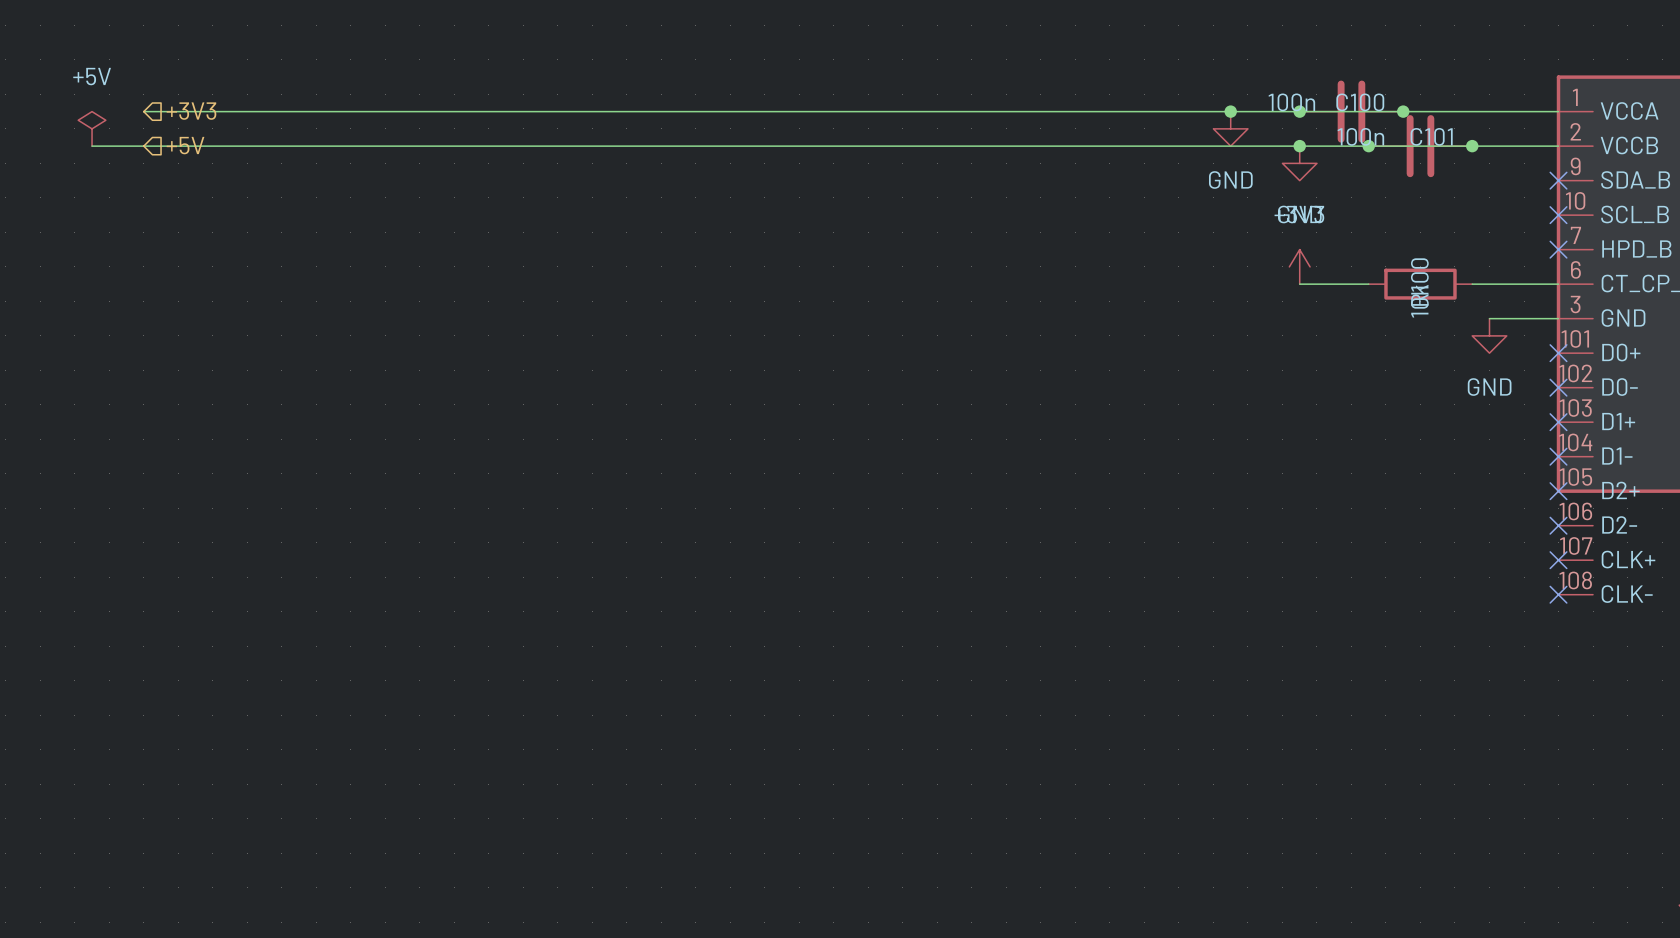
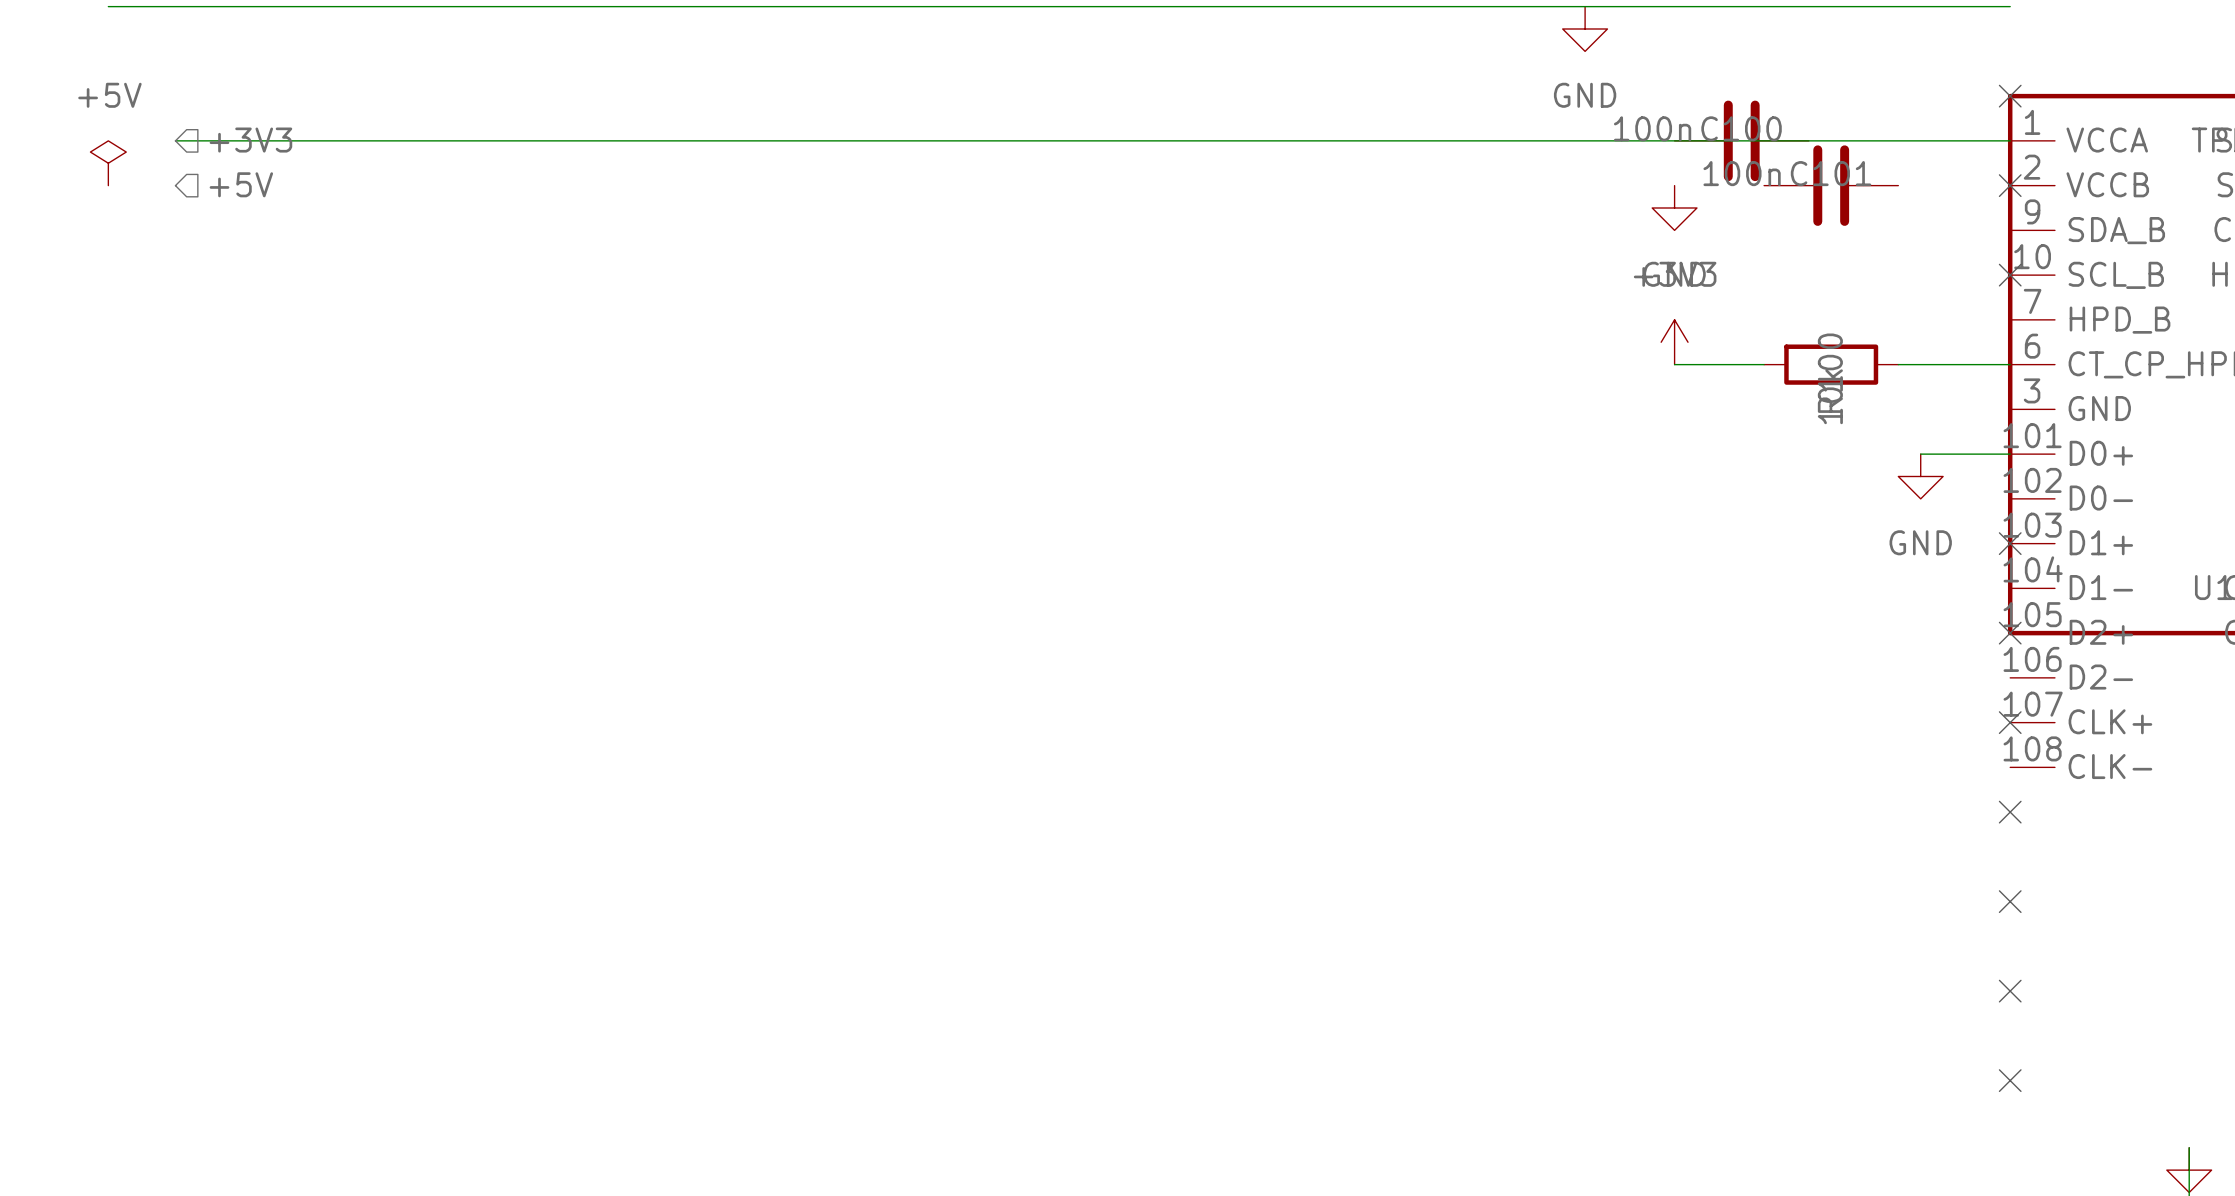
no-connect mark: none -> (2010, 96)
junction: (1230, 111) -> none
junction: (1299, 111) -> none
junction: (1403, 111) -> none
power symbol position: GND (1230, 128) -> GND (1585, 28)
wire: (92, 146) (1558, 146) -> (108, 6) (2010, 6)
junction: (1299, 146) -> none
junction: (1368, 146) -> none
junction: (1472, 146) -> none
no-connect mark position: (1558, 180) -> (2010, 185)
no-connect mark: (1558, 249) -> none
wire: (1489, 318) (1558, 318) -> (1920, 454) (2010, 454)
power symbol position: GND (1489, 335) -> GND (1920, 476)
no-connect mark: (1558, 353) -> none
no-connect mark: (1558, 387) -> none
no-connect mark: (1558, 456) -> none
no-connect mark: (1558, 525) -> none
no-connect mark position: (1558, 594) -> (2010, 812)
no-connect mark: none -> (2010, 901)
no-connect mark: none -> (2010, 991)
no-connect mark: none -> (2010, 1080)

